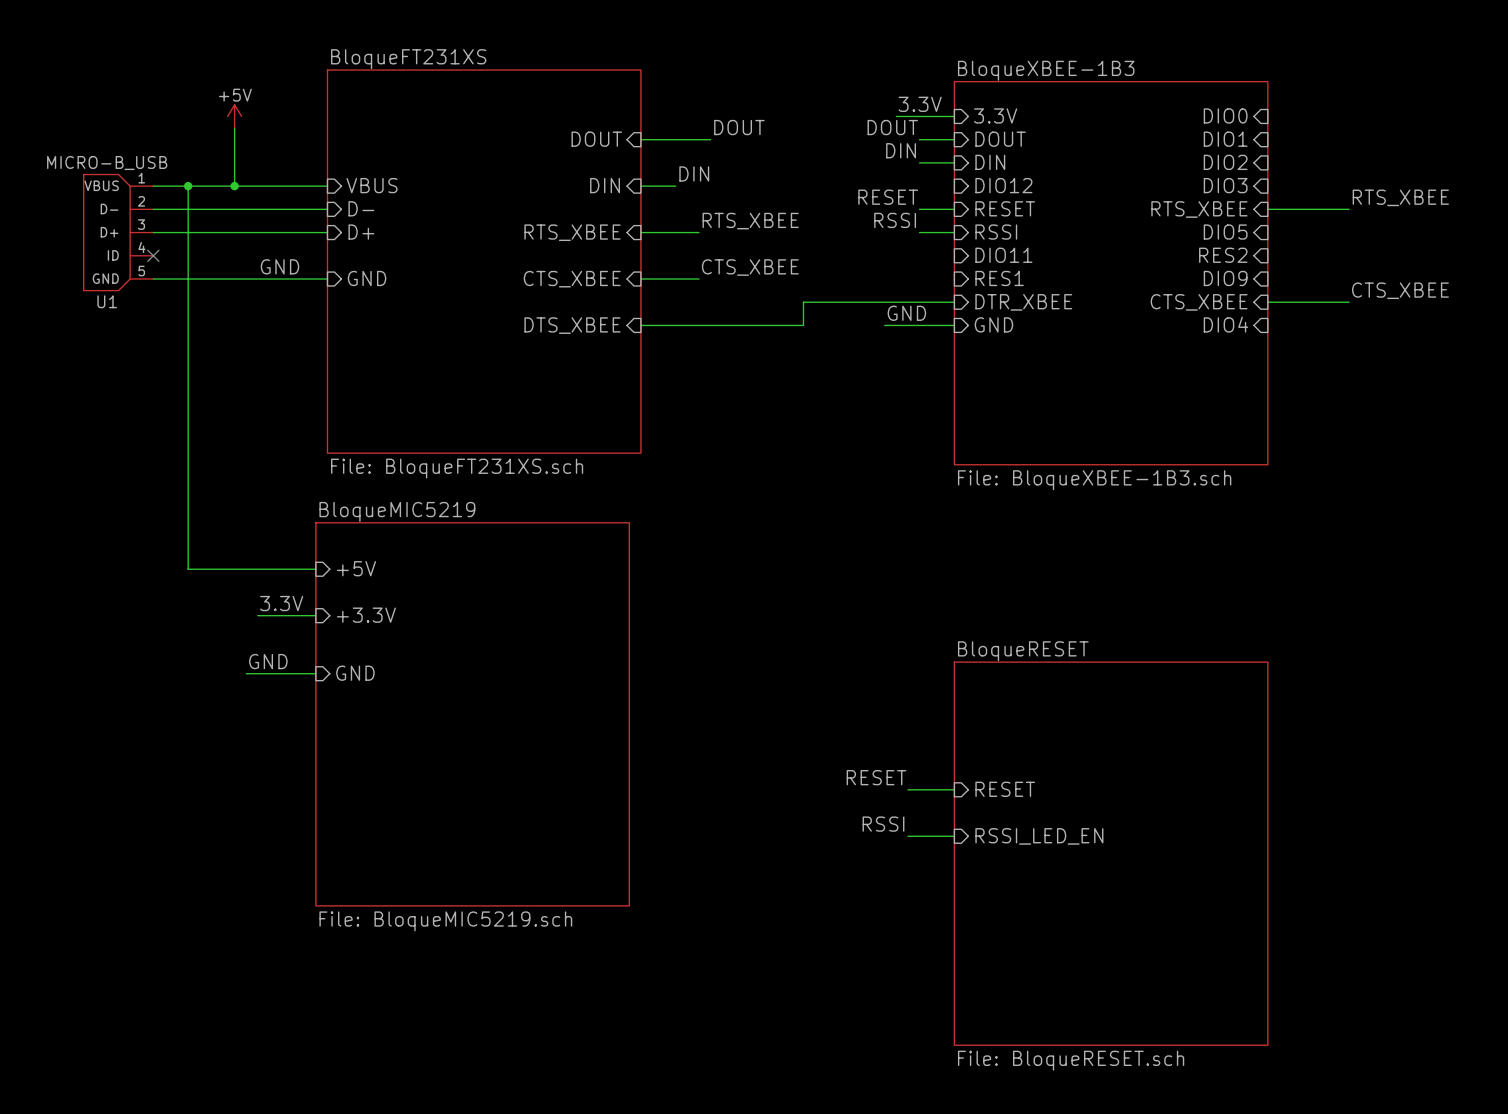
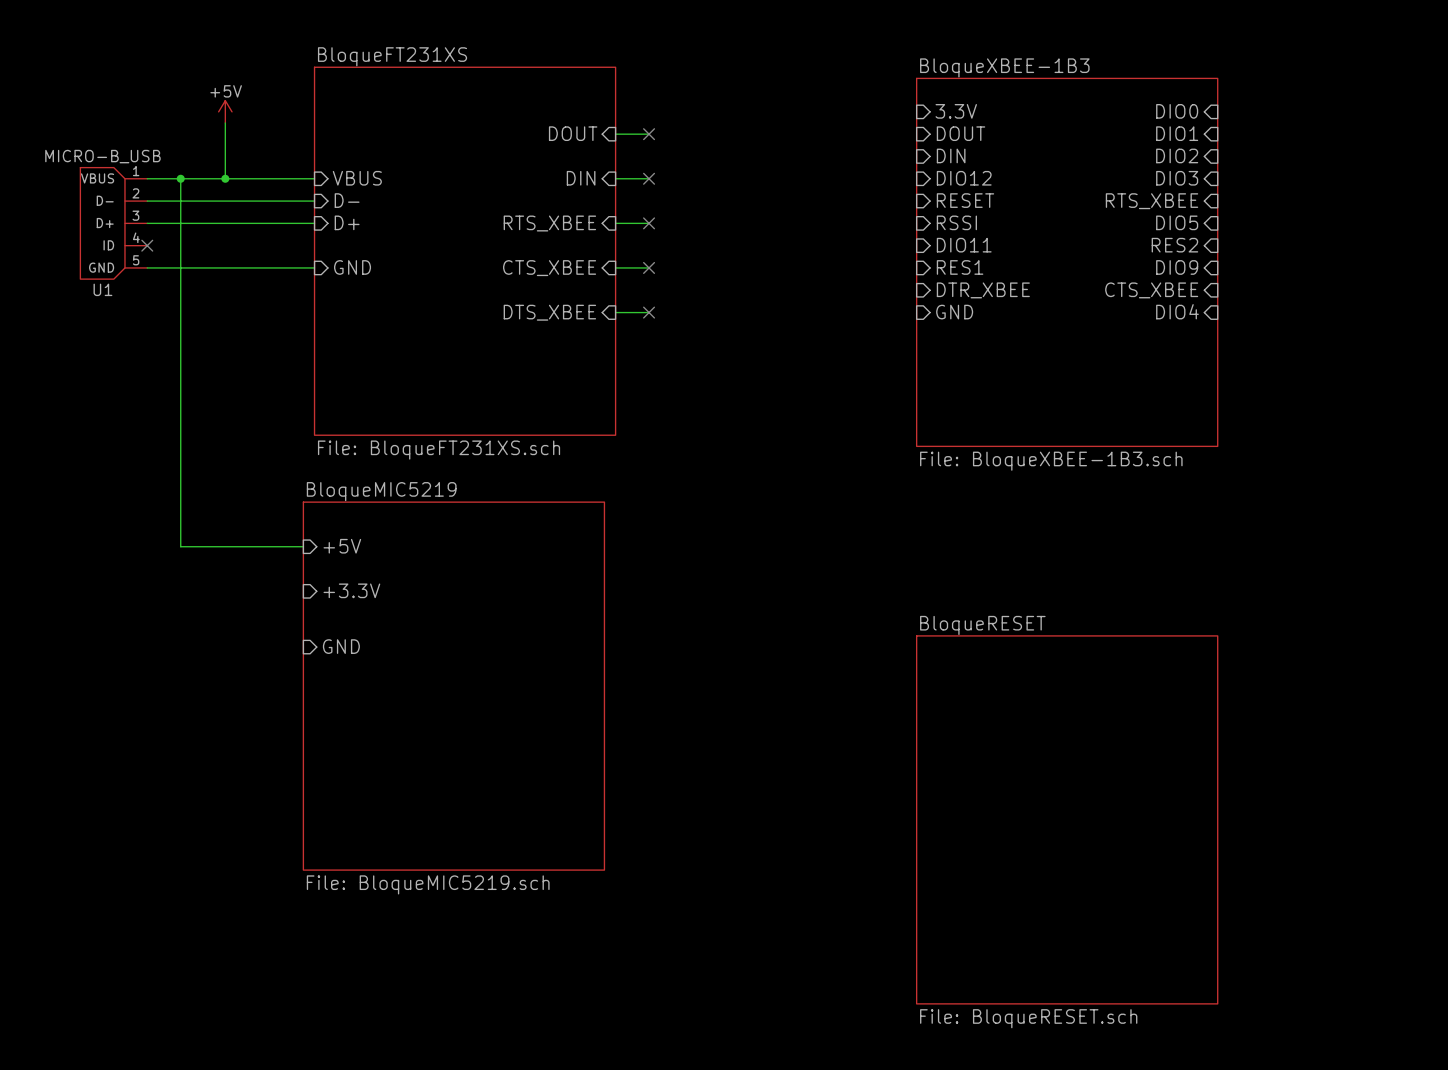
label: 3.3V (920, 104) -> none
wire: (896, 116) (954, 116) -> none
label: DOUT (739, 127) -> none
label: DOUT (892, 127) -> none
wire: (675, 139) (710, 139) -> none
no-connect mark: none -> (649, 134)
wire: (919, 139) (954, 139) -> none
label: DIN (901, 150) -> none
wire: (919, 162) (954, 162) -> none
label: DIN (694, 173) -> none
no-connect mark: none -> (649, 178)
label: RESET (888, 197) -> none
label: RTS_XBEE (1400, 197) -> none
wire: (919, 209) (954, 209) -> none
wire: (1267, 209) (1349, 209) -> none
label: RSSI (895, 220) -> none
label: RTS_XBEE (750, 221) -> none
wire: (675, 232) (698, 232) -> none
no-connect mark: none -> (649, 223)
wire: (919, 232) (954, 232) -> none
label: GND (279, 266) -> none
label: CTS_XBEE (750, 267) -> none
wire: (675, 279) (698, 279) -> none
no-connect mark: none -> (649, 267)
label: CTS_XBEE (1400, 290) -> none
wire: (954, 302) (803, 302) (803, 325) (675, 325) -> none
wire: (1267, 302) (1349, 302) -> none
label: GND (906, 313) -> none
no-connect mark: none -> (649, 312)
wire: (884, 325) (954, 325) -> none
label: 3.3V (281, 603) -> none
wire: (257, 615) (315, 615) -> none
label: GND (268, 661) -> none
wire: (246, 673) (315, 673) -> none
label: RESET (876, 777) -> none
wire: (907, 789) (954, 789) -> none
sheet pin: RESET (1005, 789) -> none
label: RSSI (883, 824) -> none
wire: (907, 836) (954, 836) -> none
sheet pin: RSSI_LED_EN (1039, 836) -> none

